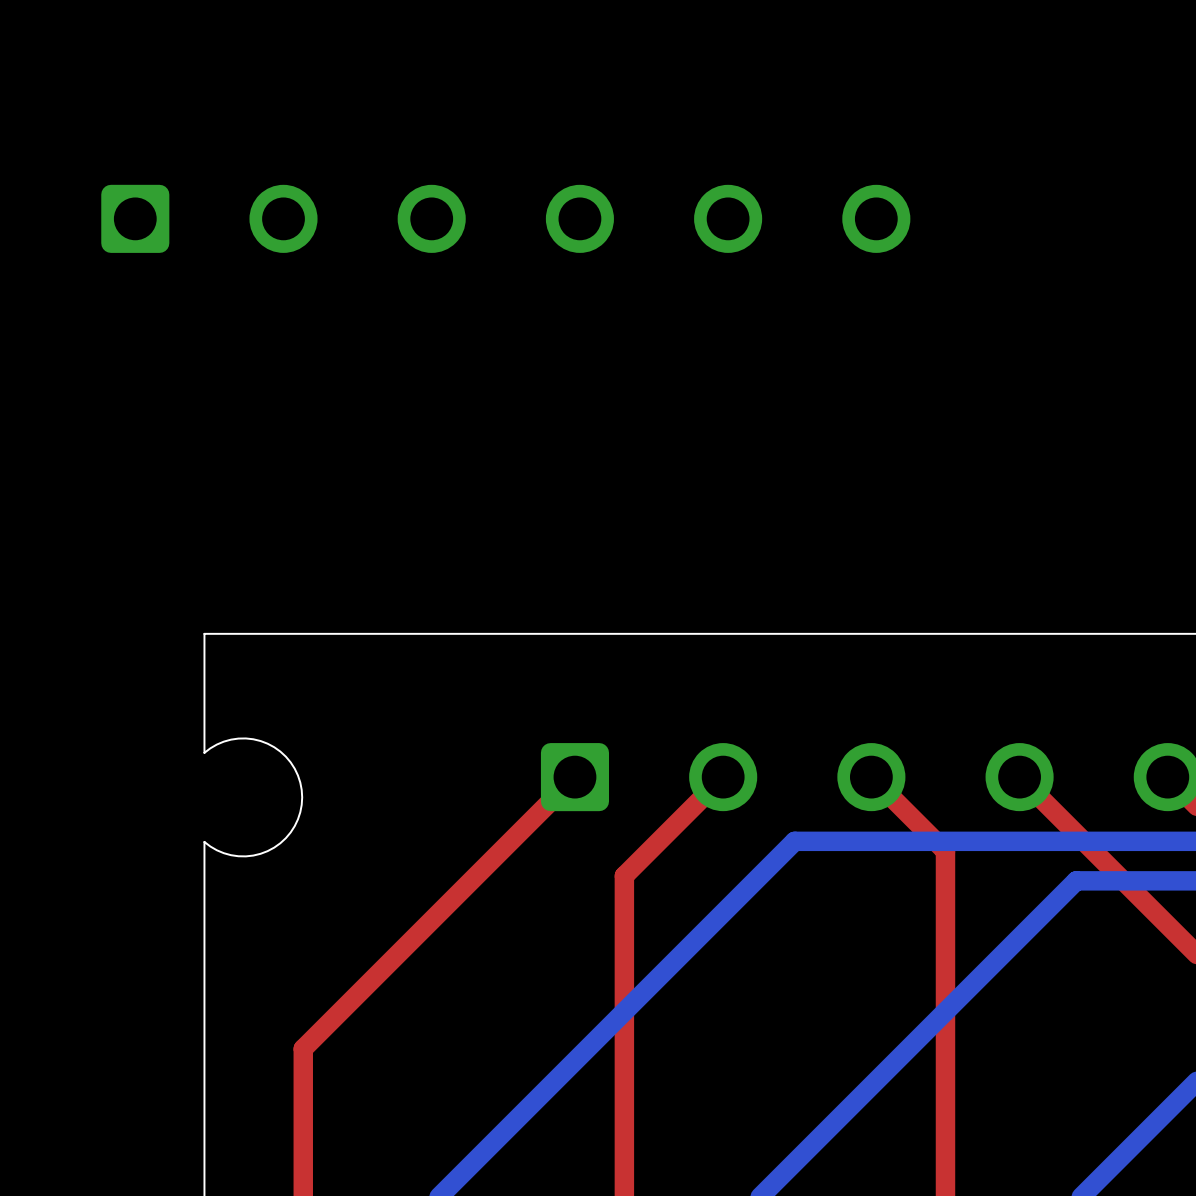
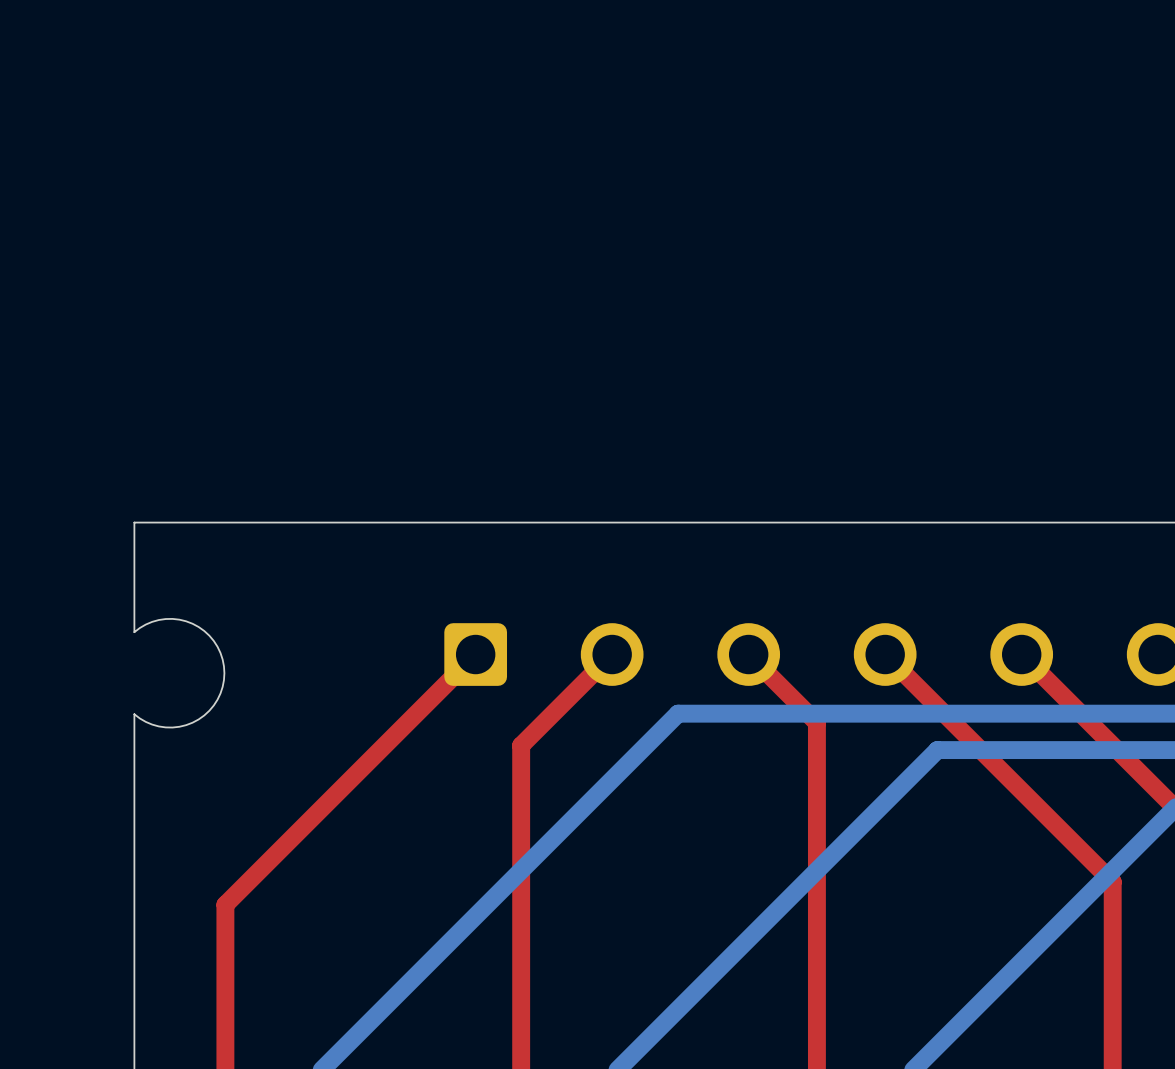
part: (505, 218) -> none

